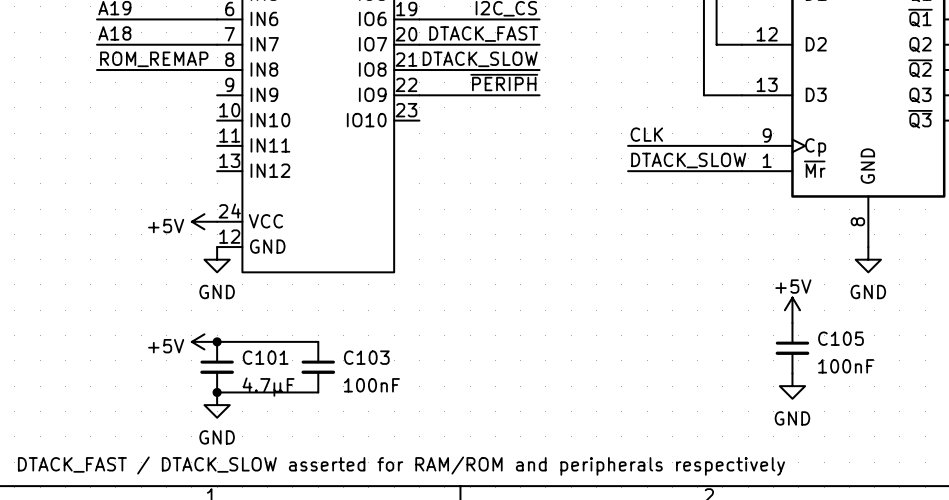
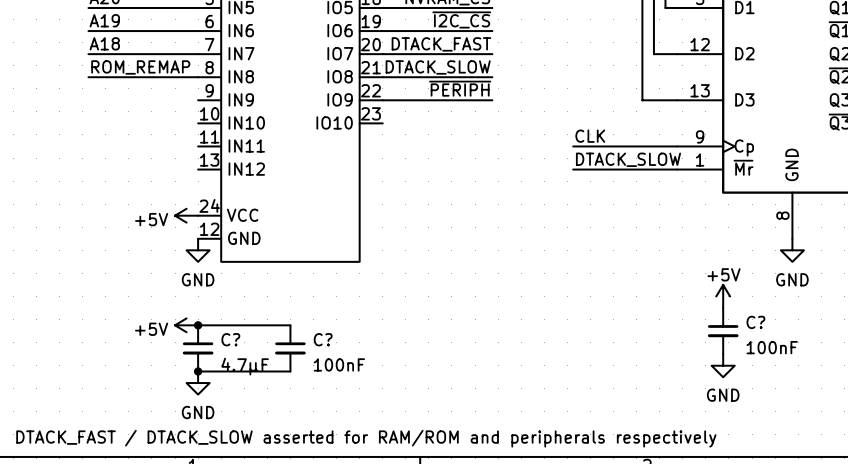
C105 name: C105 (840, 338) -> C? (755, 322)
C101 name: C101 (265, 357) -> C? (230, 339)
C103 name: C103 (366, 357) -> C? (323, 339)

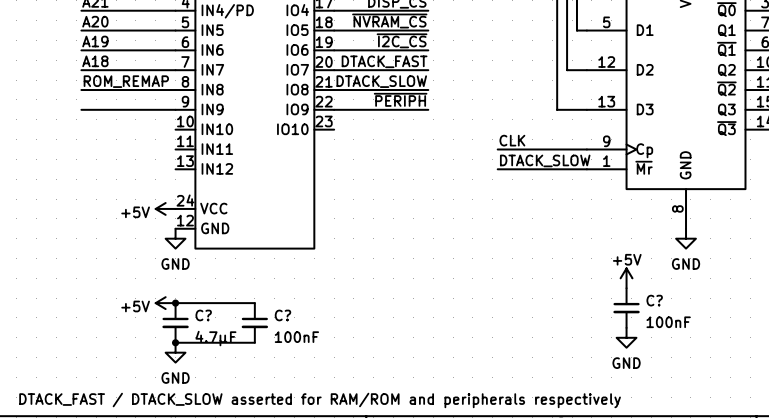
wire: none -> (81, 109) (175, 109)

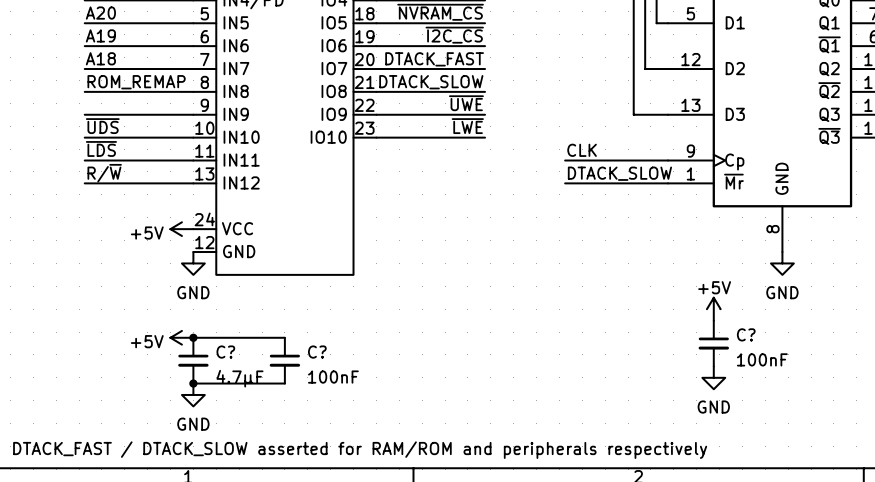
label: ~{PERIPH} (400, 99) -> ~{UWE} (466, 103)
label: none -> ~{UDS} (102, 126)
label: none -> ~{LWE} (467, 126)
wire: none -> (84, 137) (193, 137)
wire: none -> (376, 137) (485, 137)
label: none -> ~{LDS} (101, 148)
wire: none -> (84, 160) (193, 160)
label: none -> R/~{W} (104, 173)
wire: none -> (84, 183) (193, 183)

